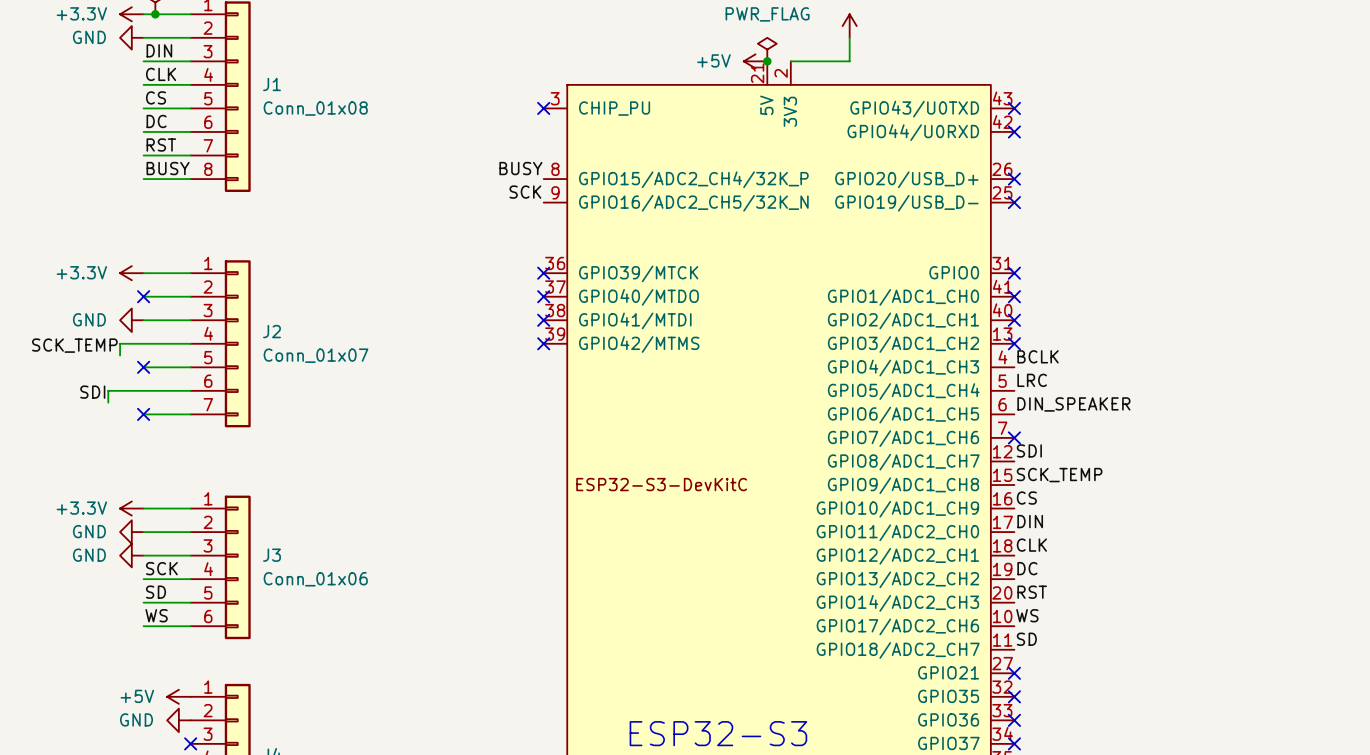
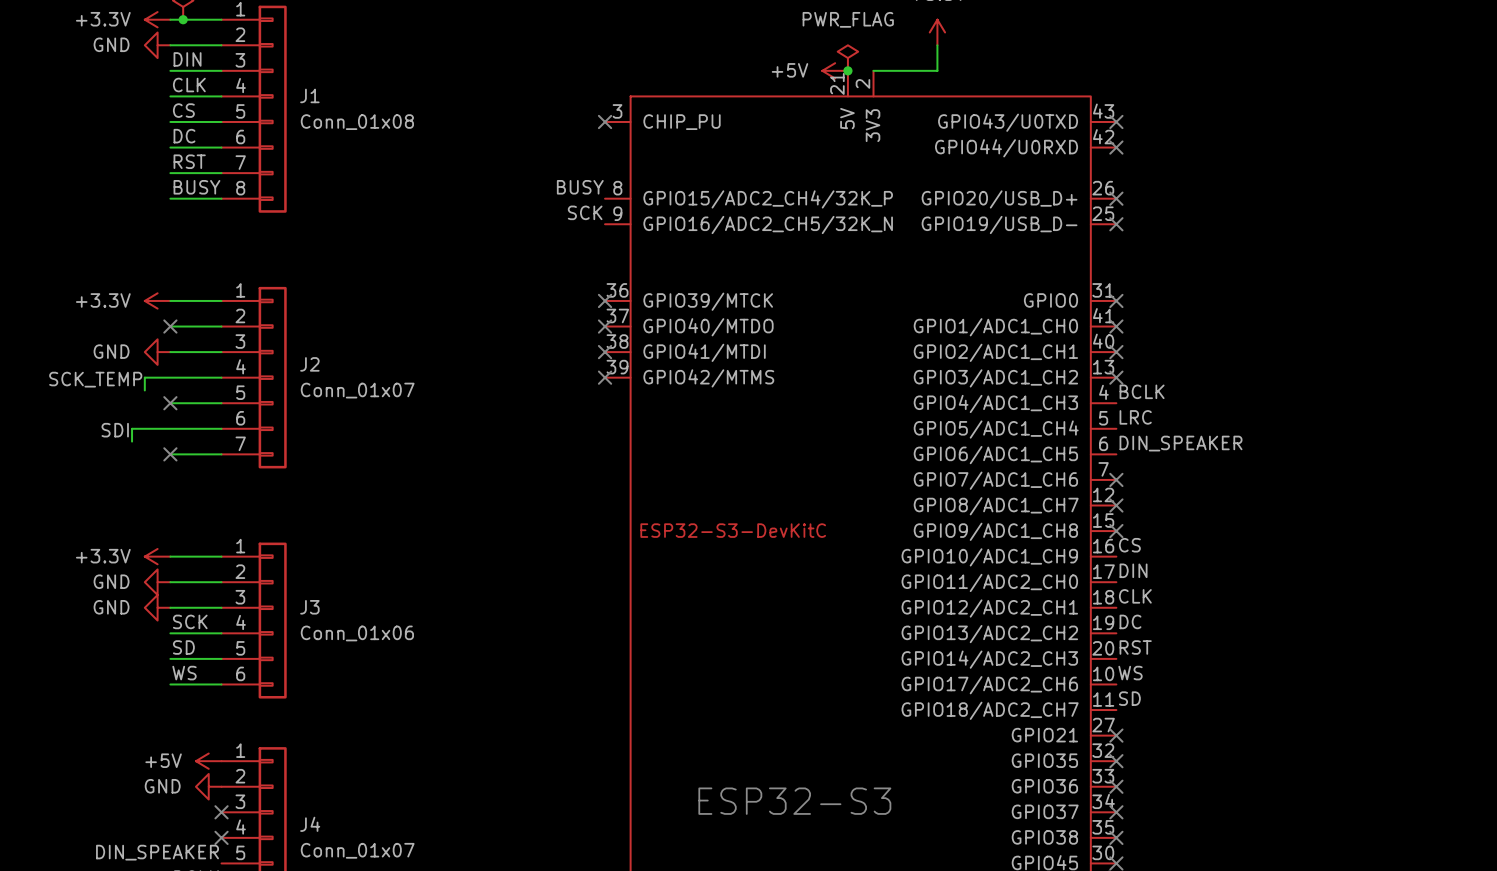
label: SDI (1029, 450) -> none
no-connect mark: none -> (1116, 505)
label: SCK_TEMP (1059, 475) -> none
no-connect mark: none -> (1116, 531)

